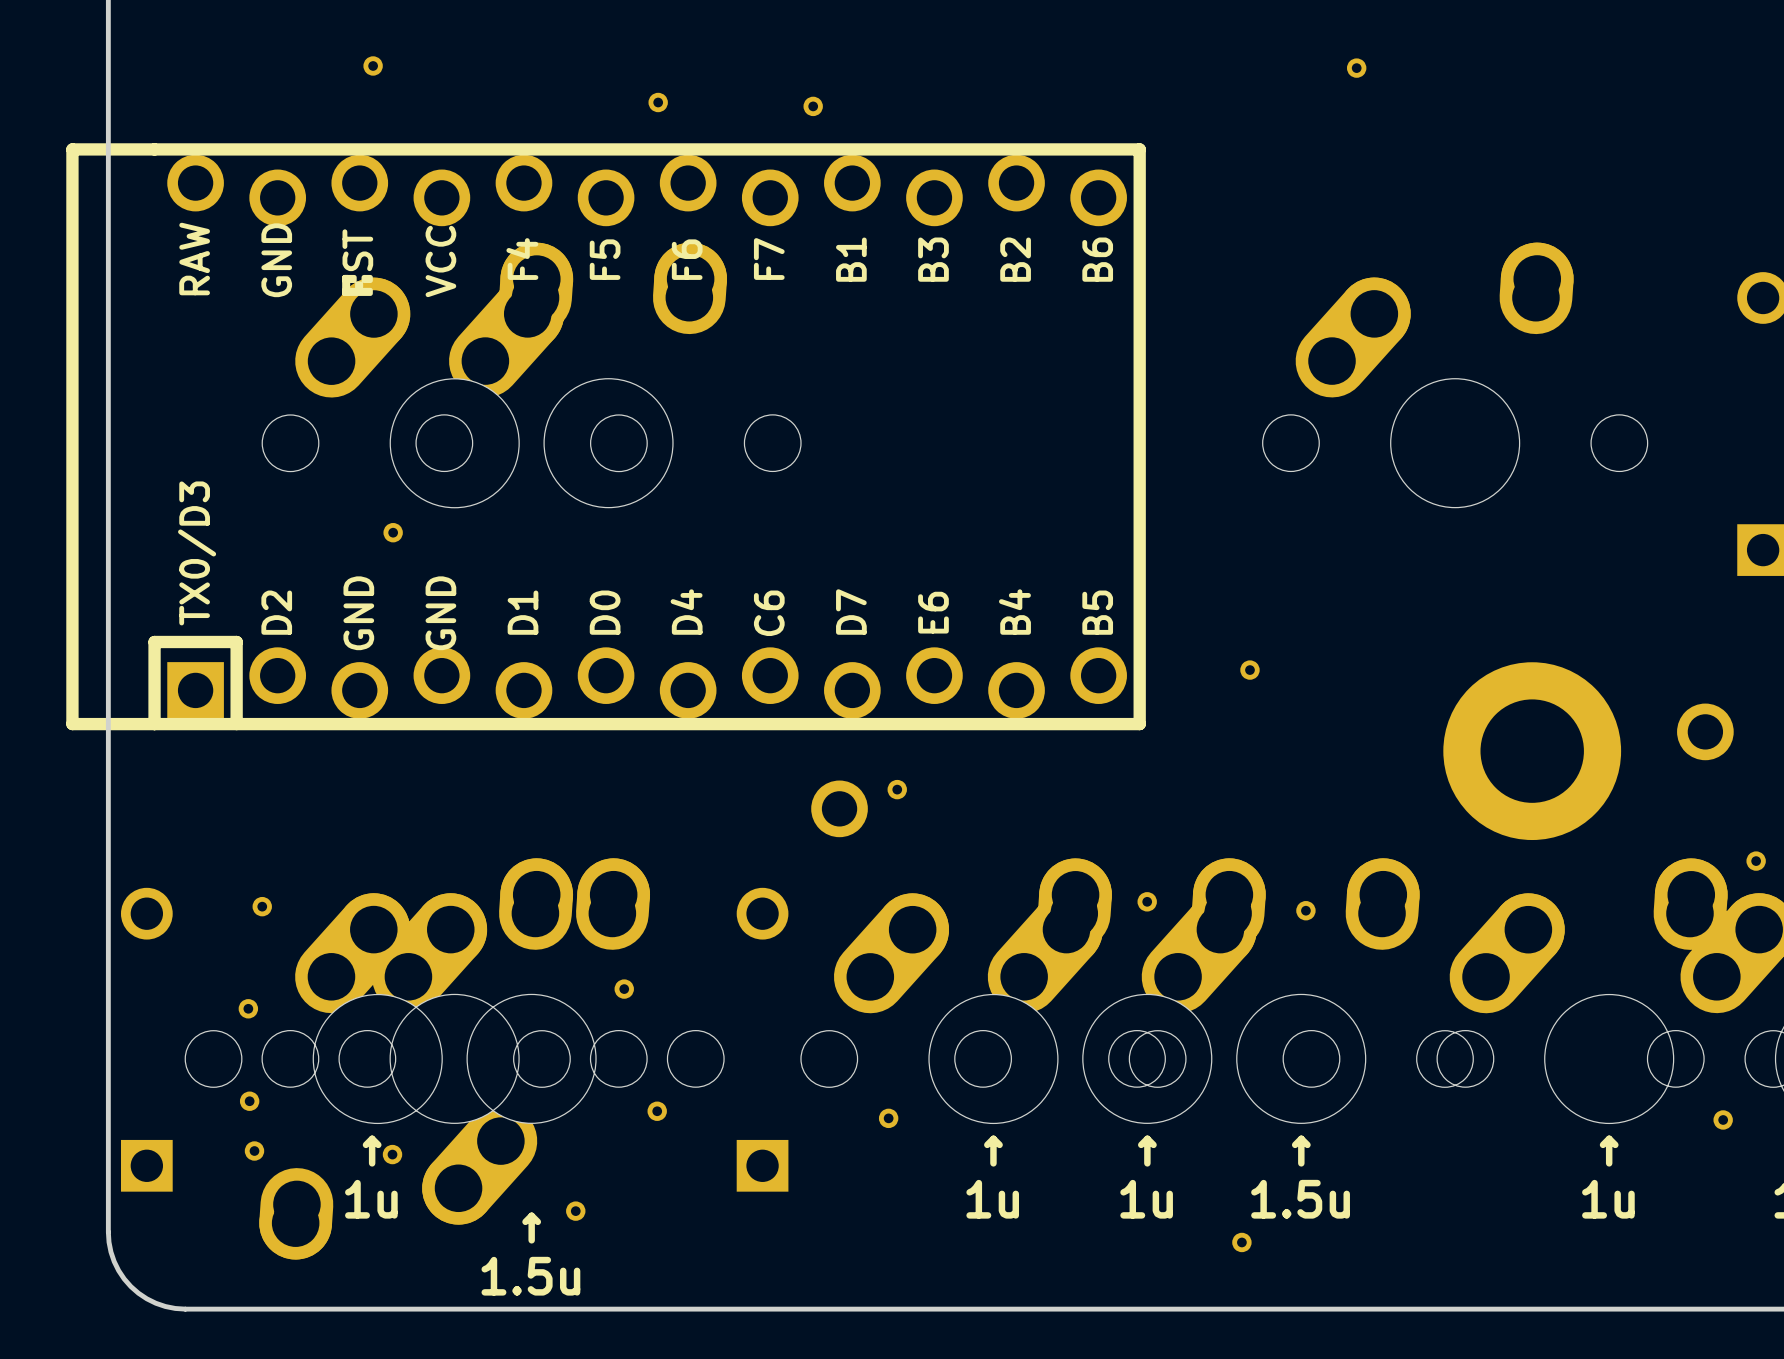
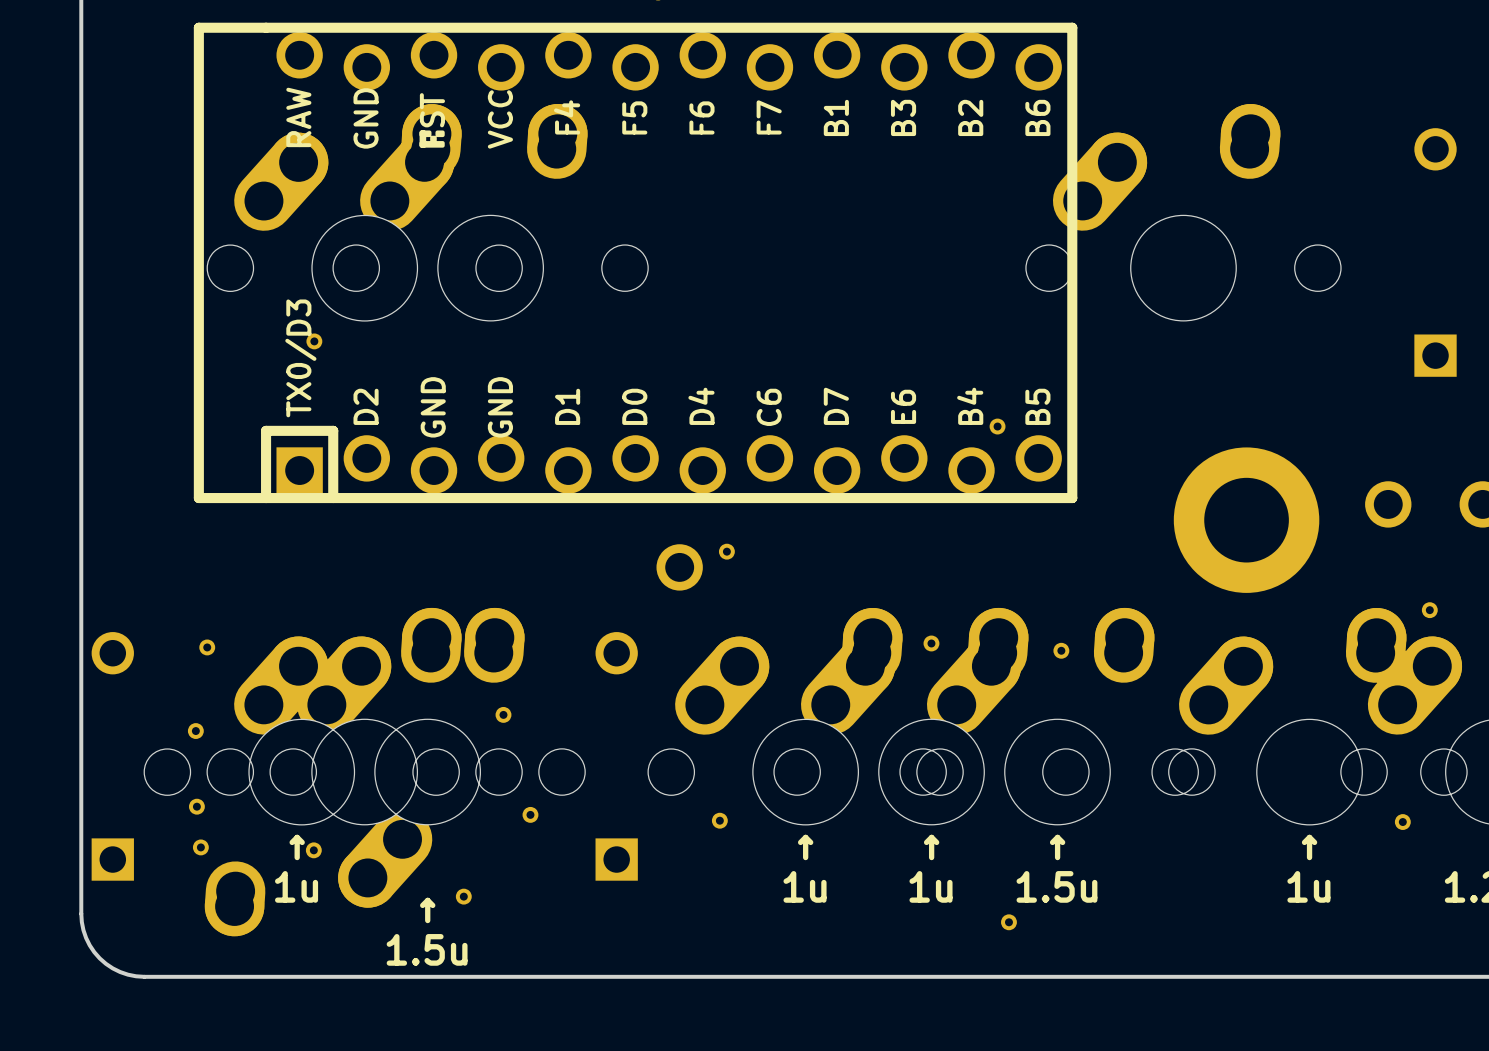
part position: (606, 436) -> (635, 262)
part position: (1249, 670) -> (997, 426)

